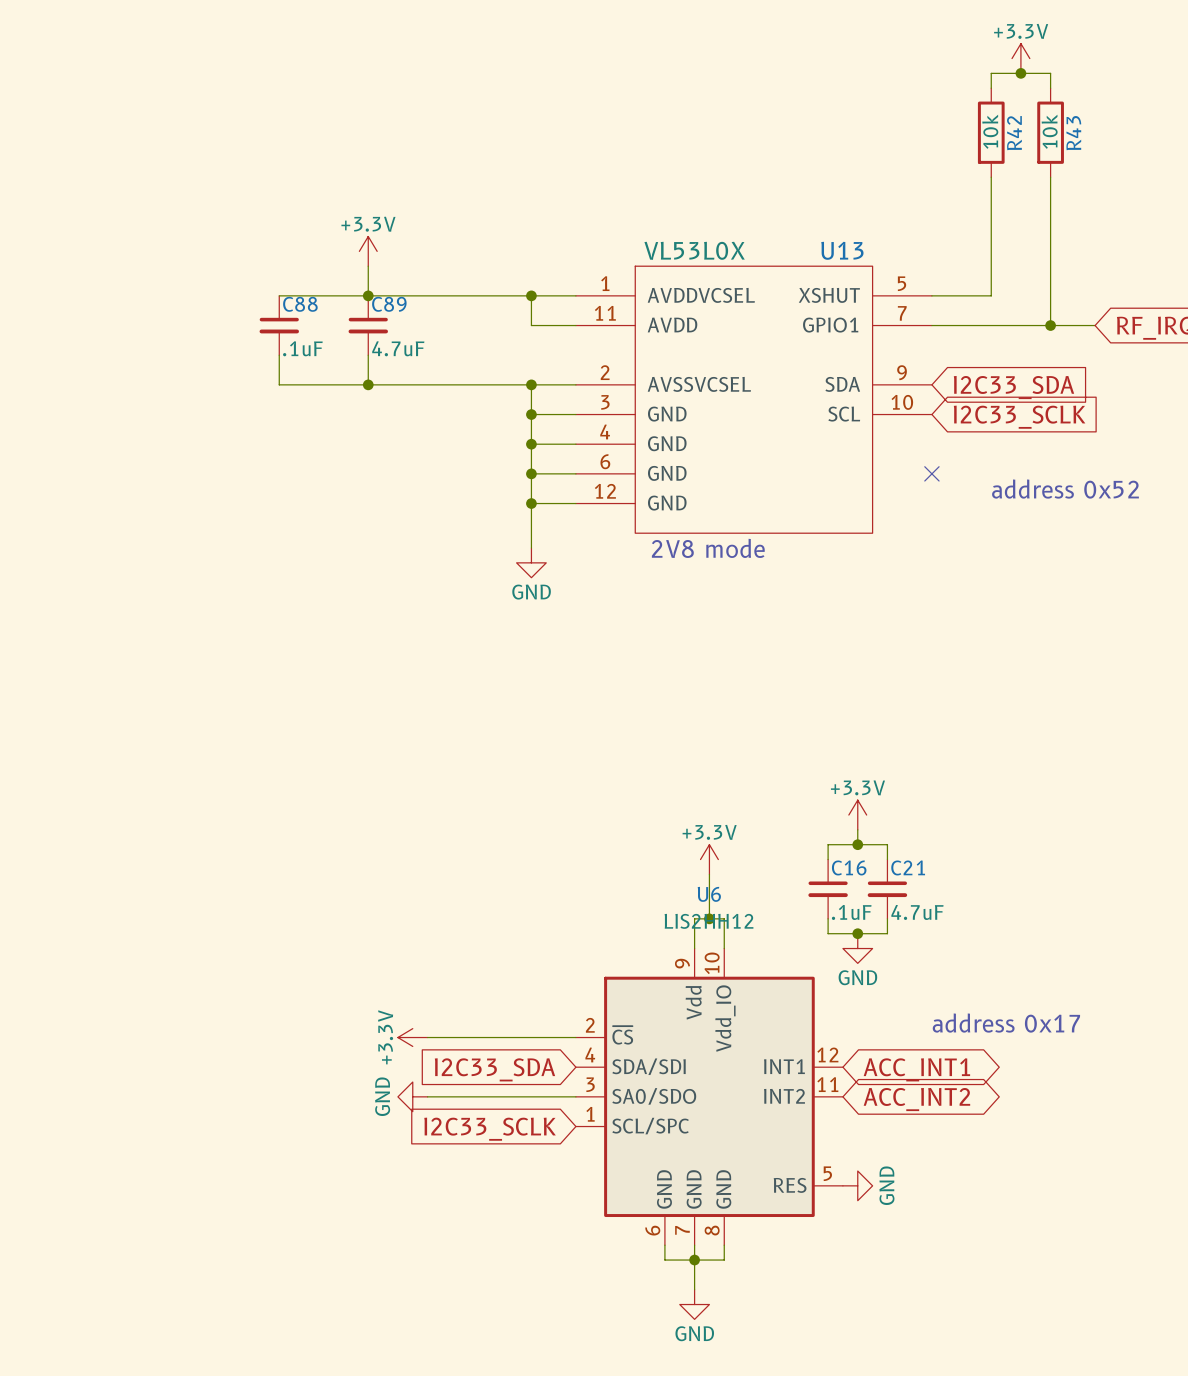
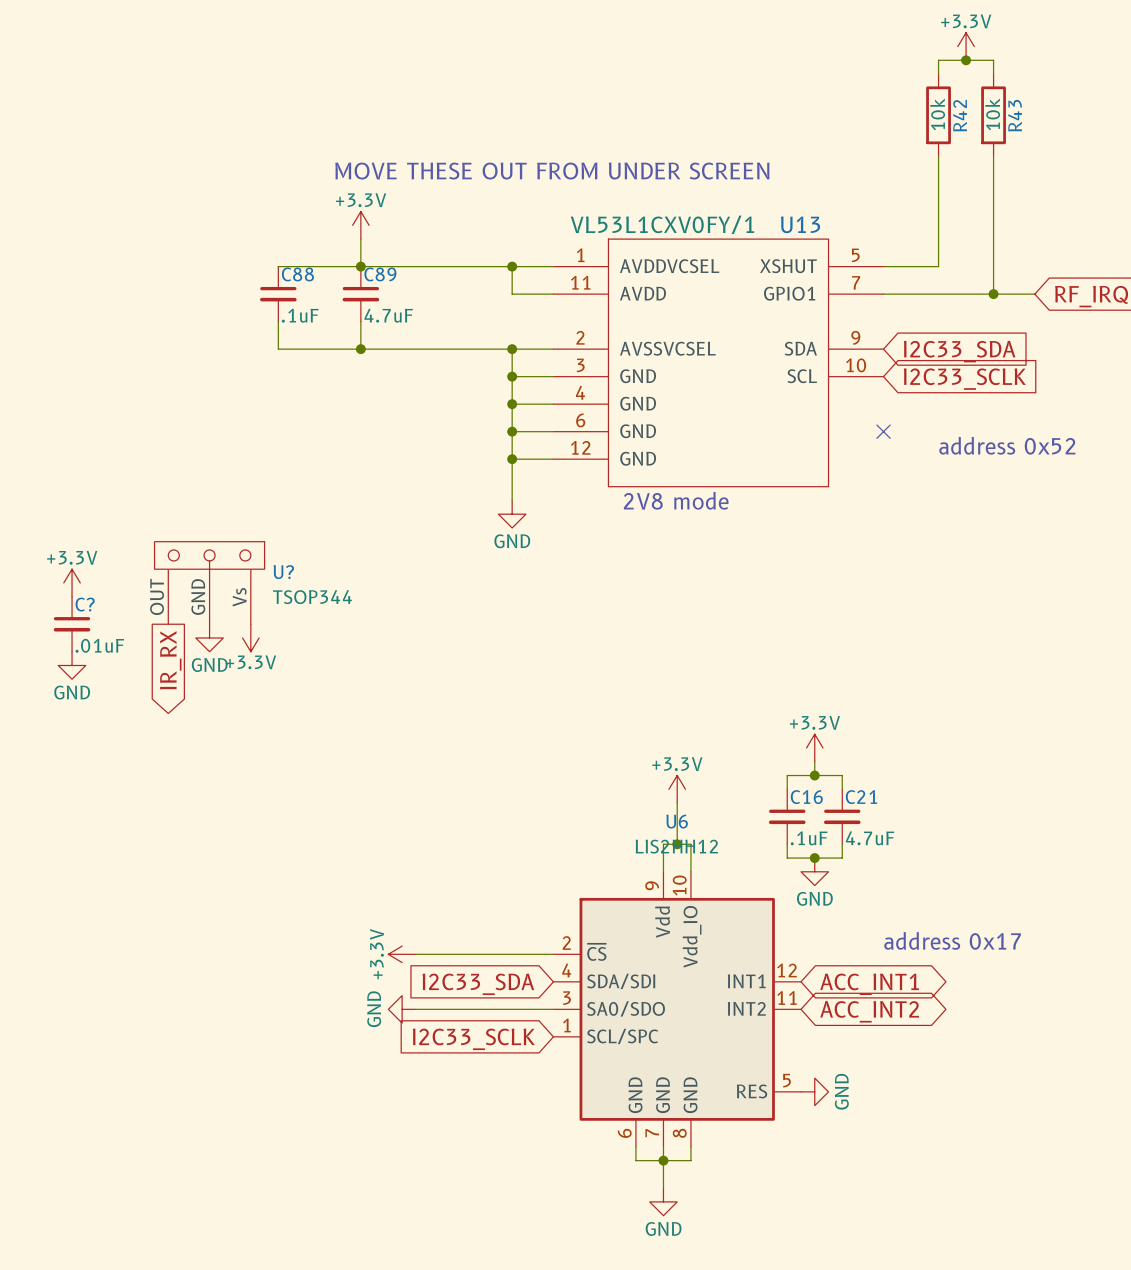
text: none -> MOVE THESE OUT FROM UNDER SCREEN (552, 171)
U13 value: VL53L0X (694, 250) -> VL53L1CXV0FY/1 (662, 224)
power symbol: none -> +3.3V (72, 582)
U?: none -> TSOP344 (209, 582)
C?: none -> .01uF (72, 624)
power symbol: none -> GND (209, 637)
power symbol: none -> +3.3V (250, 637)
global label: none -> IR_RX (170, 660)
power symbol: none -> GND (72, 665)

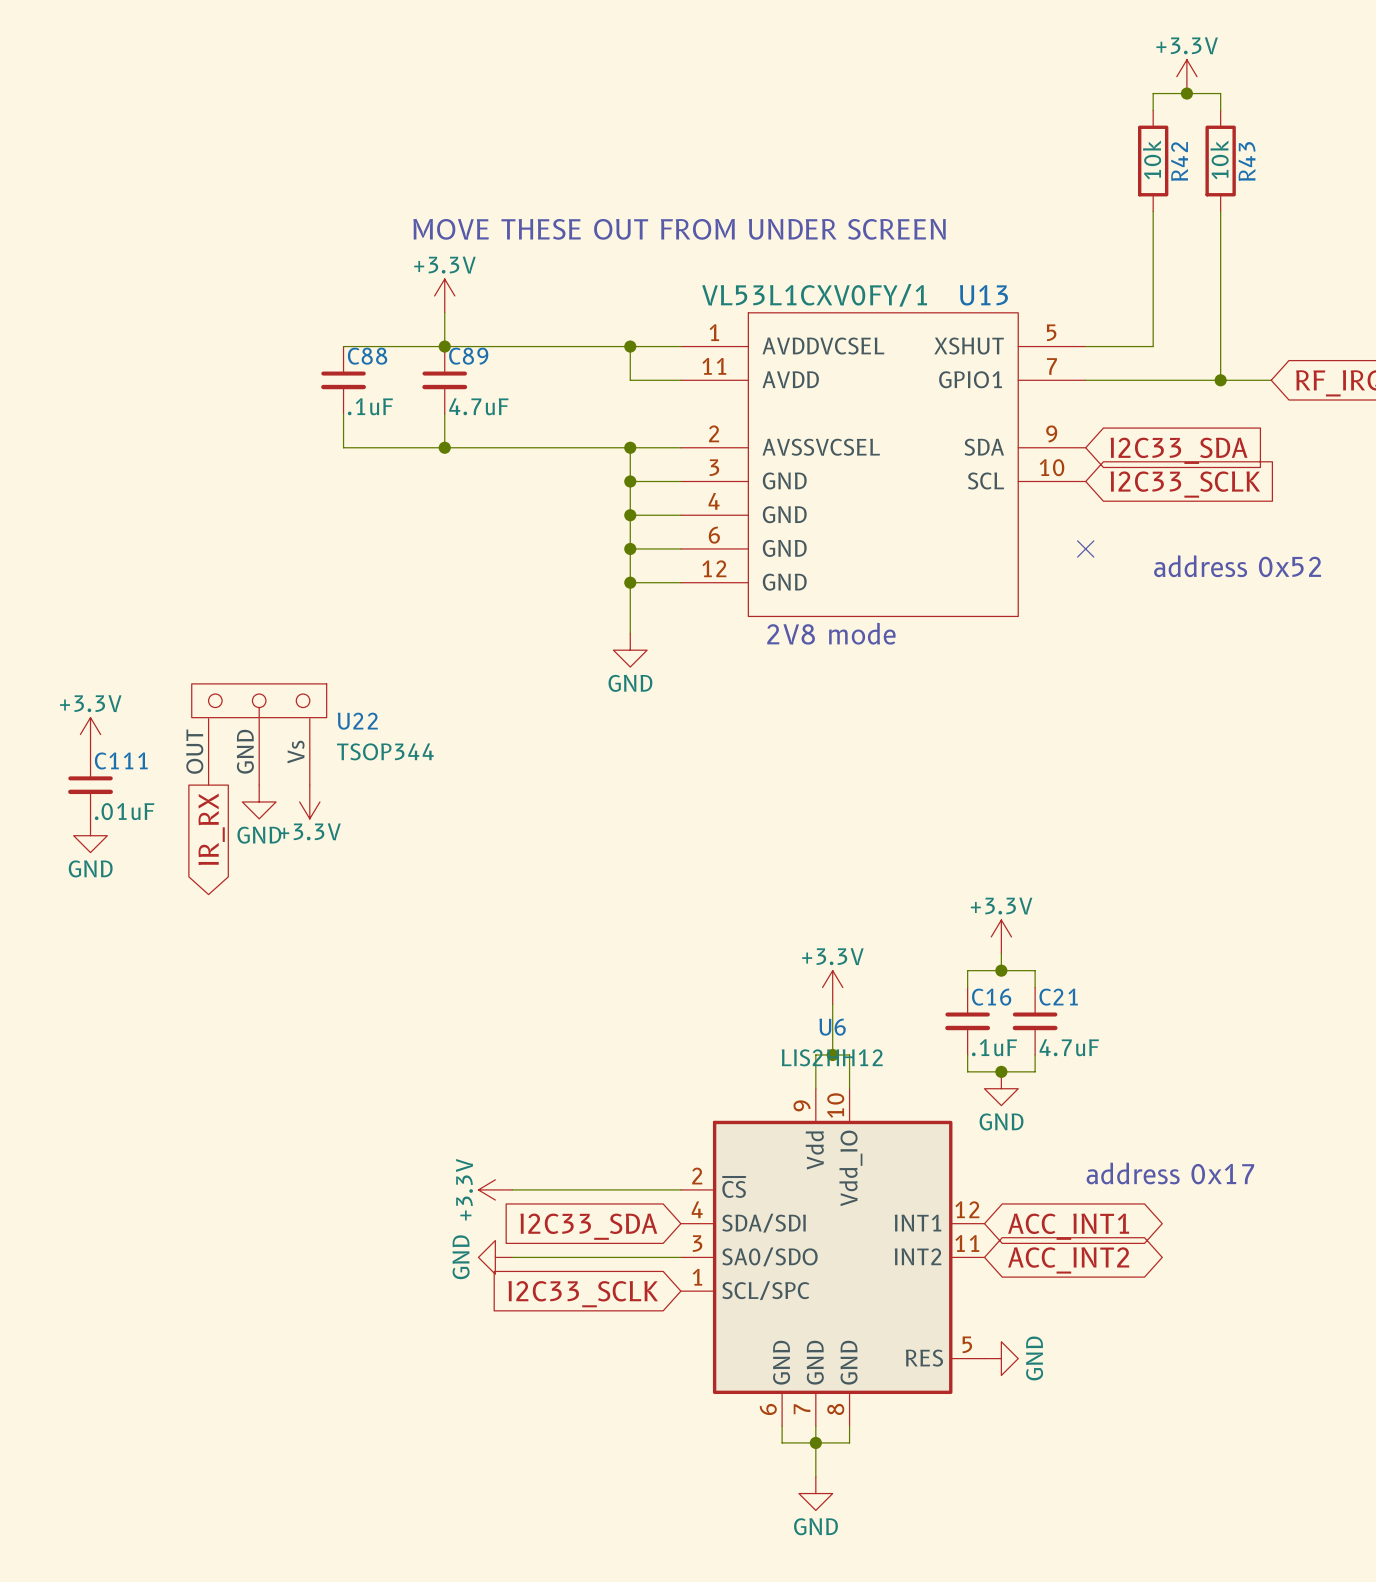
U? name: U? (283, 572) -> U22 (357, 721)
C? name: C? (85, 604) -> C111 (121, 760)

